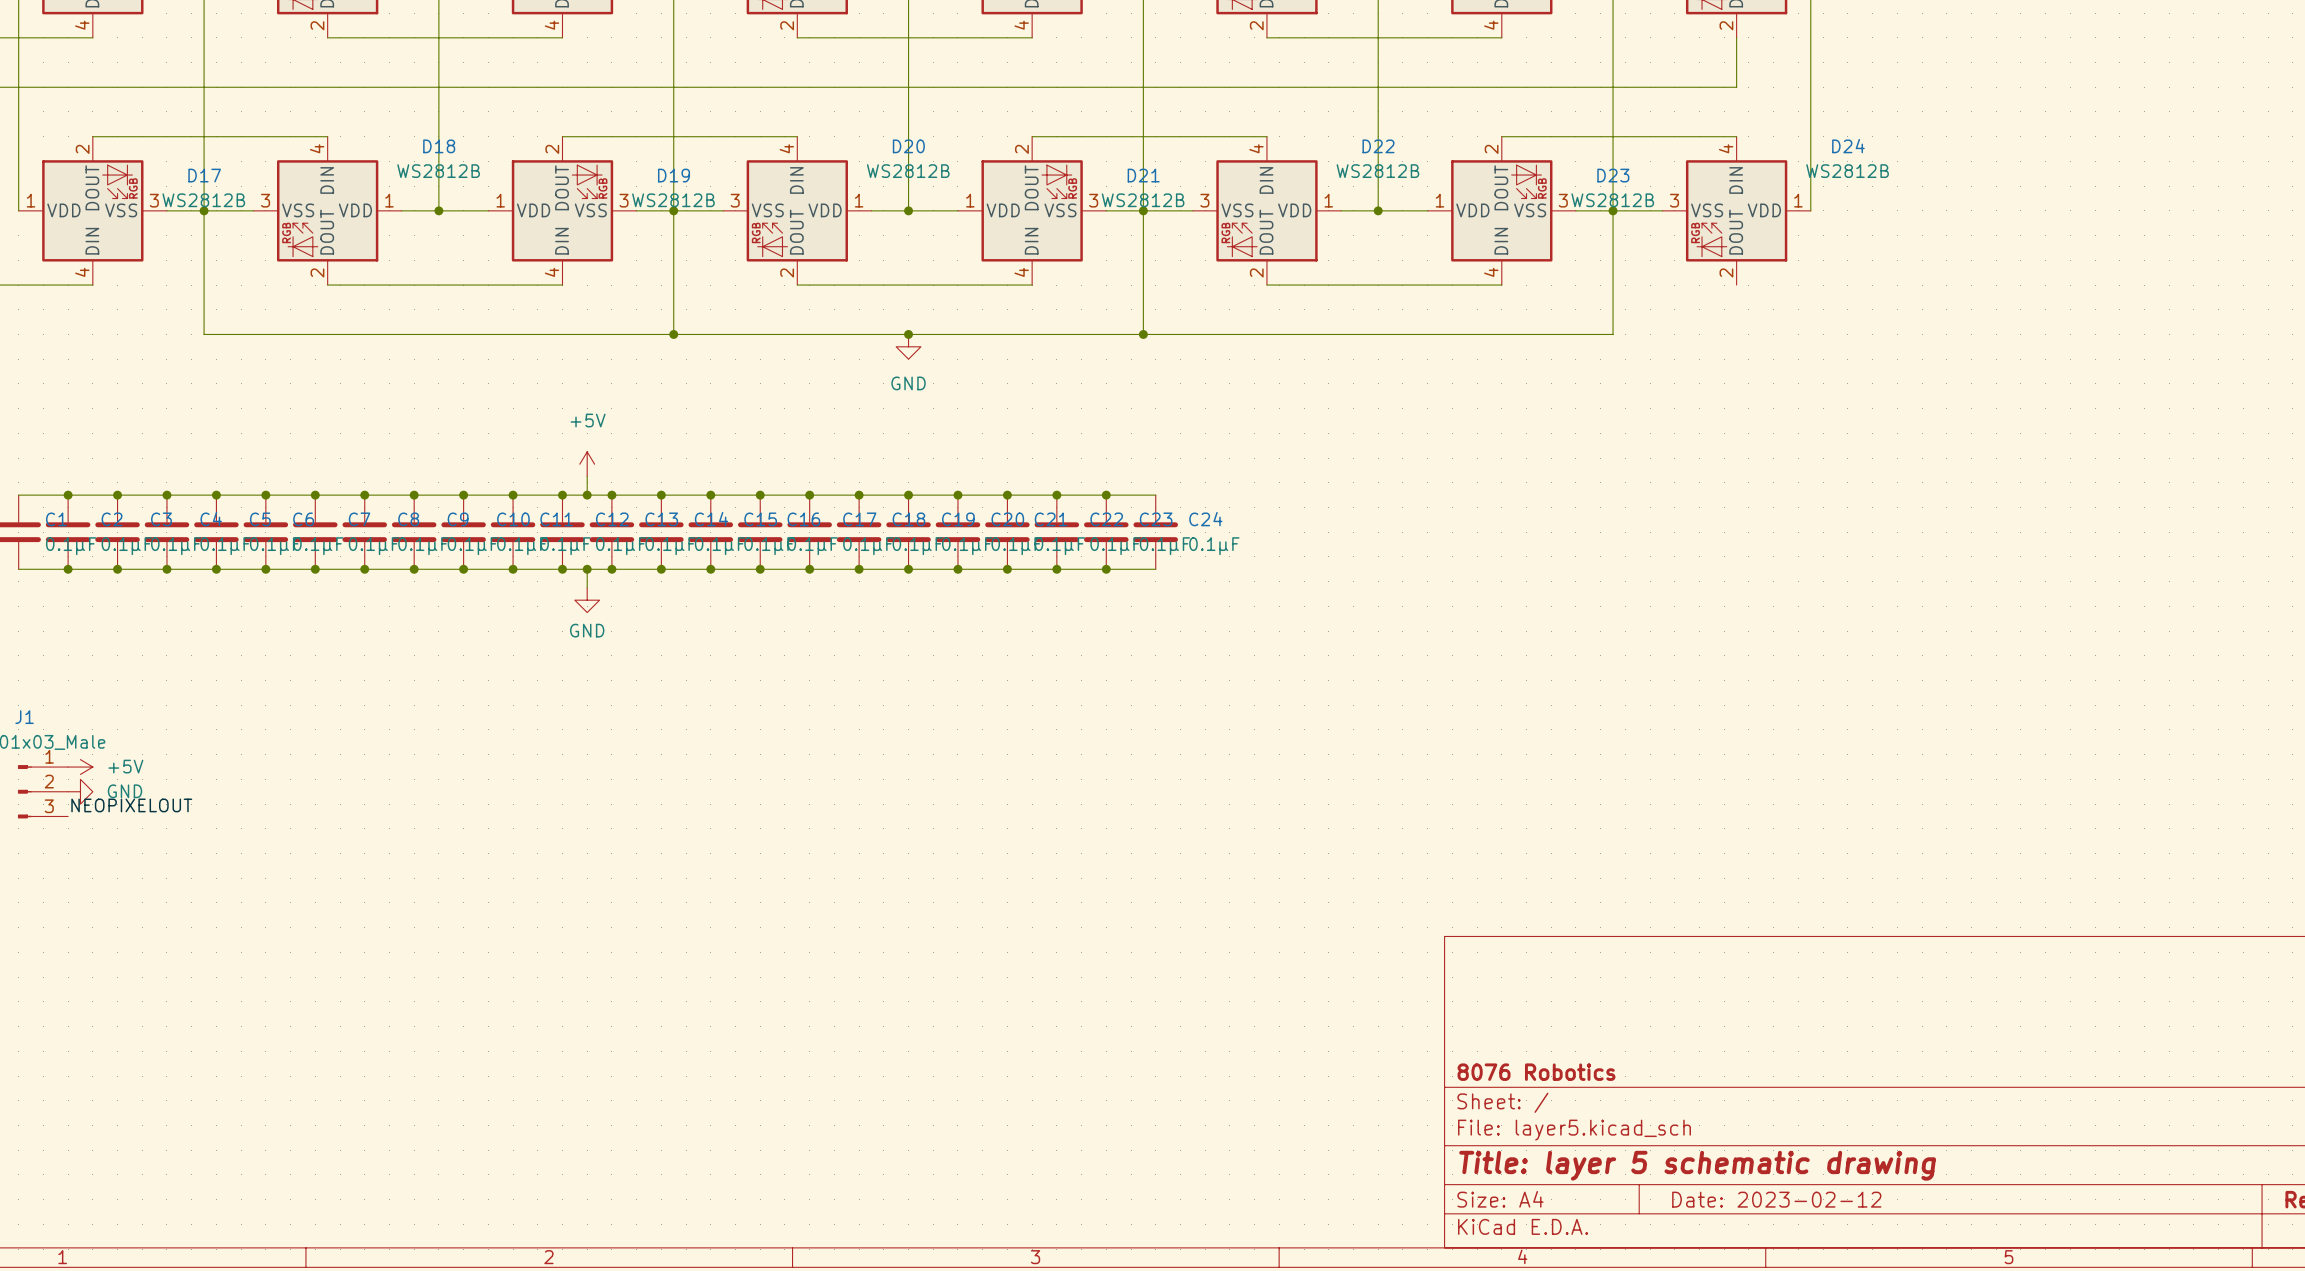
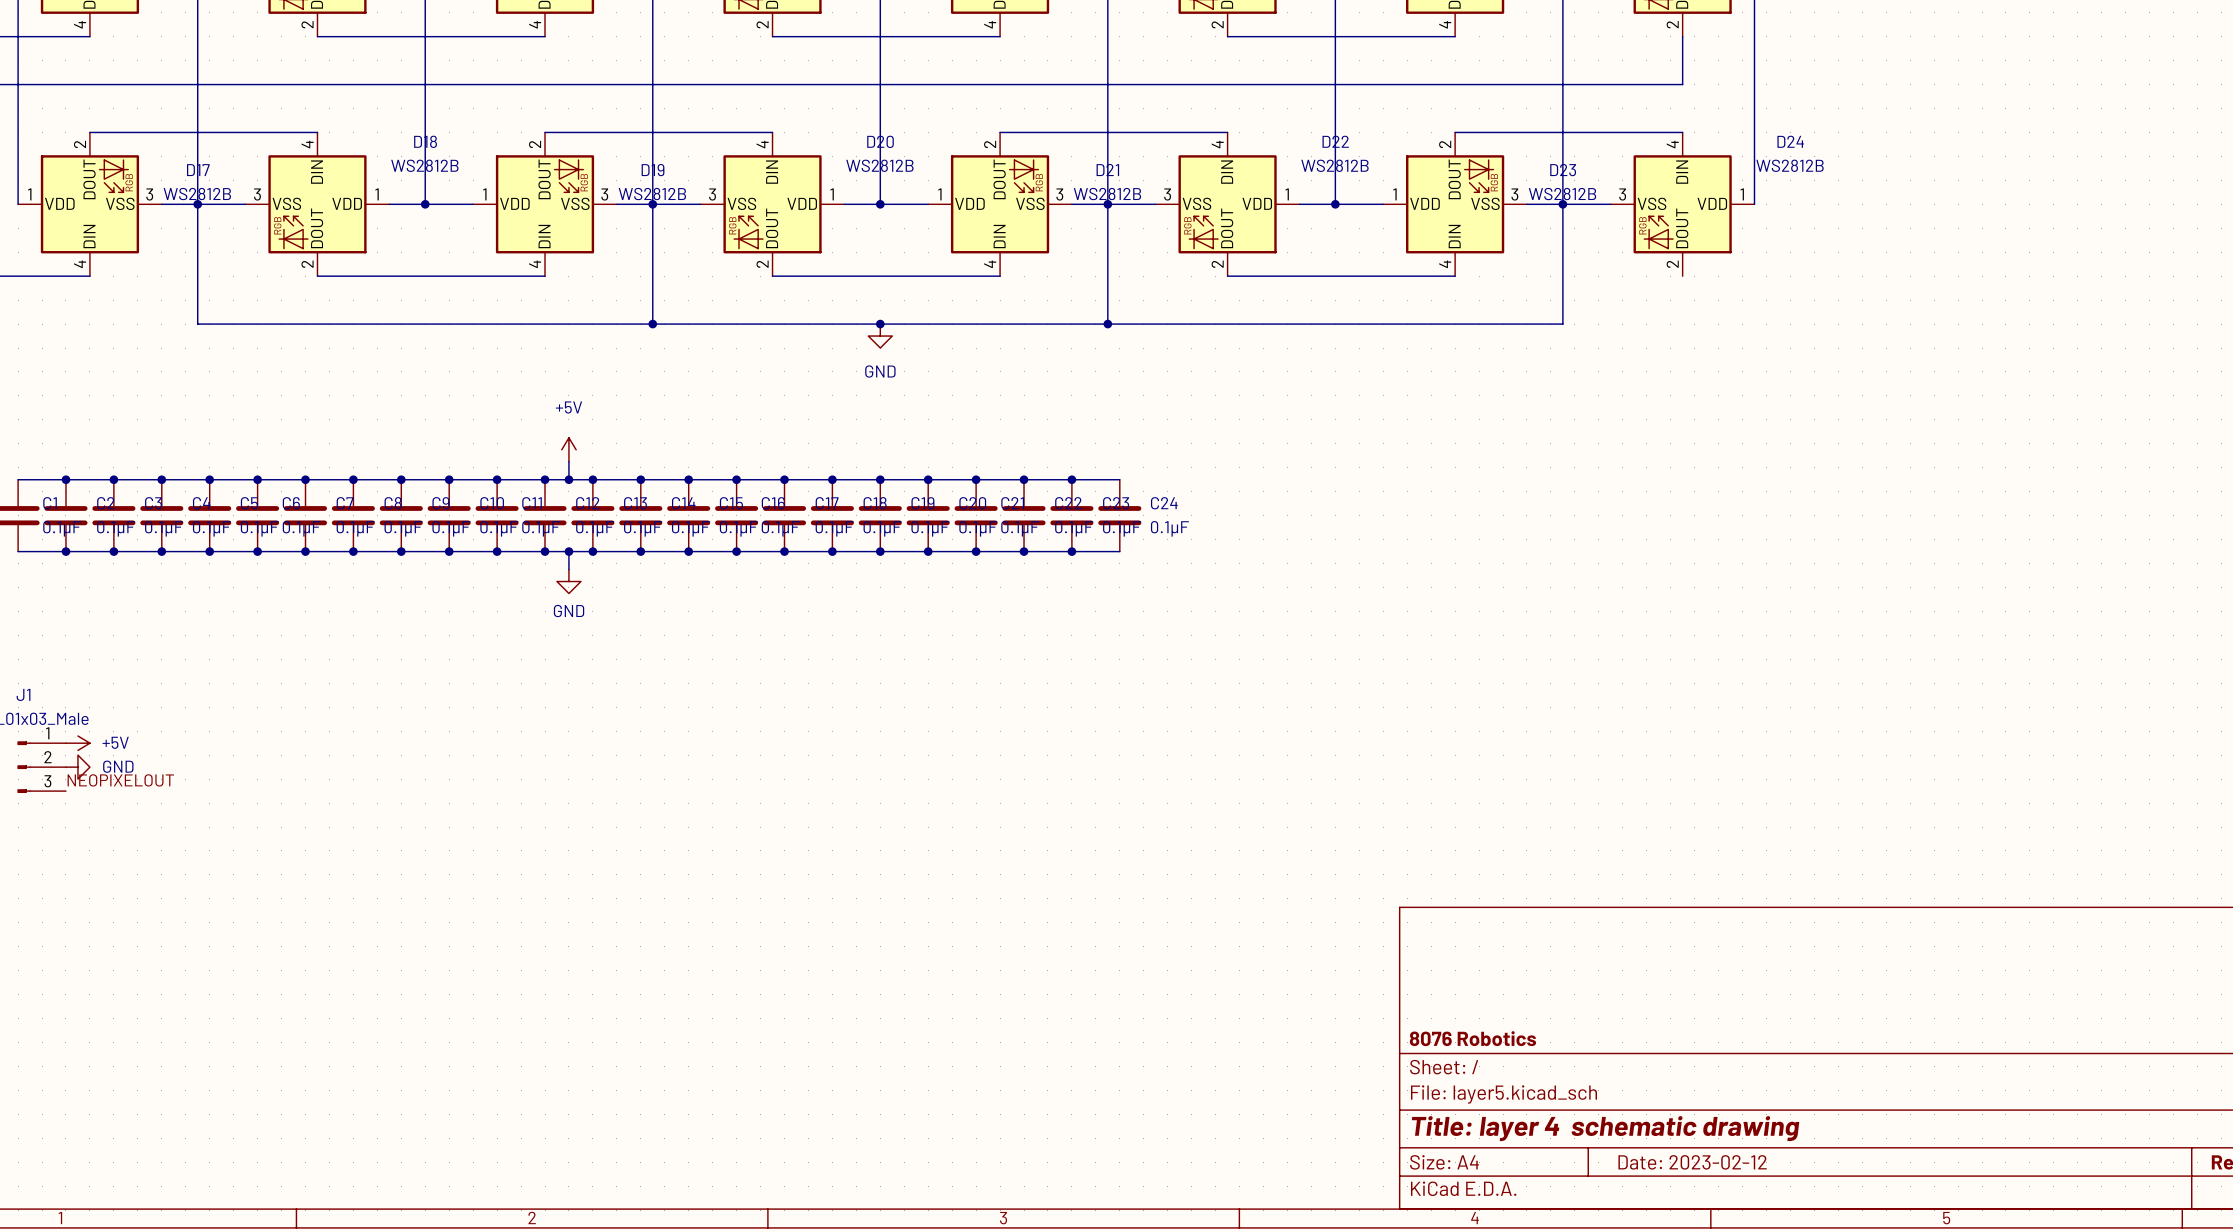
title block: Title: layer 5 schematic drawing (1697, 1165) -> Title: layer 4 schematic drawing (1605, 1128)

